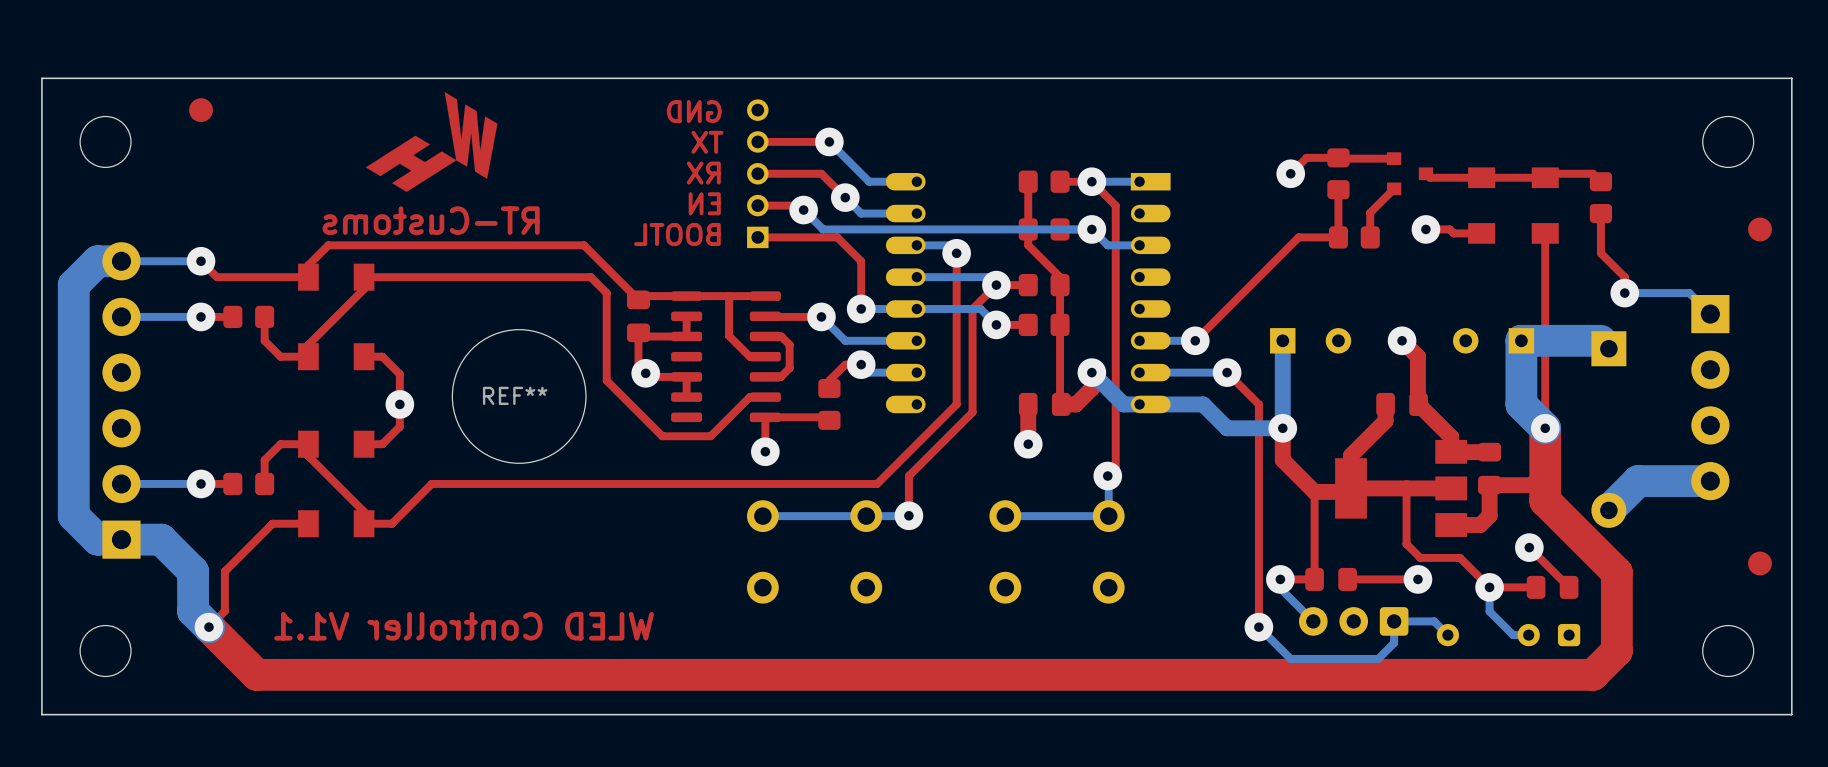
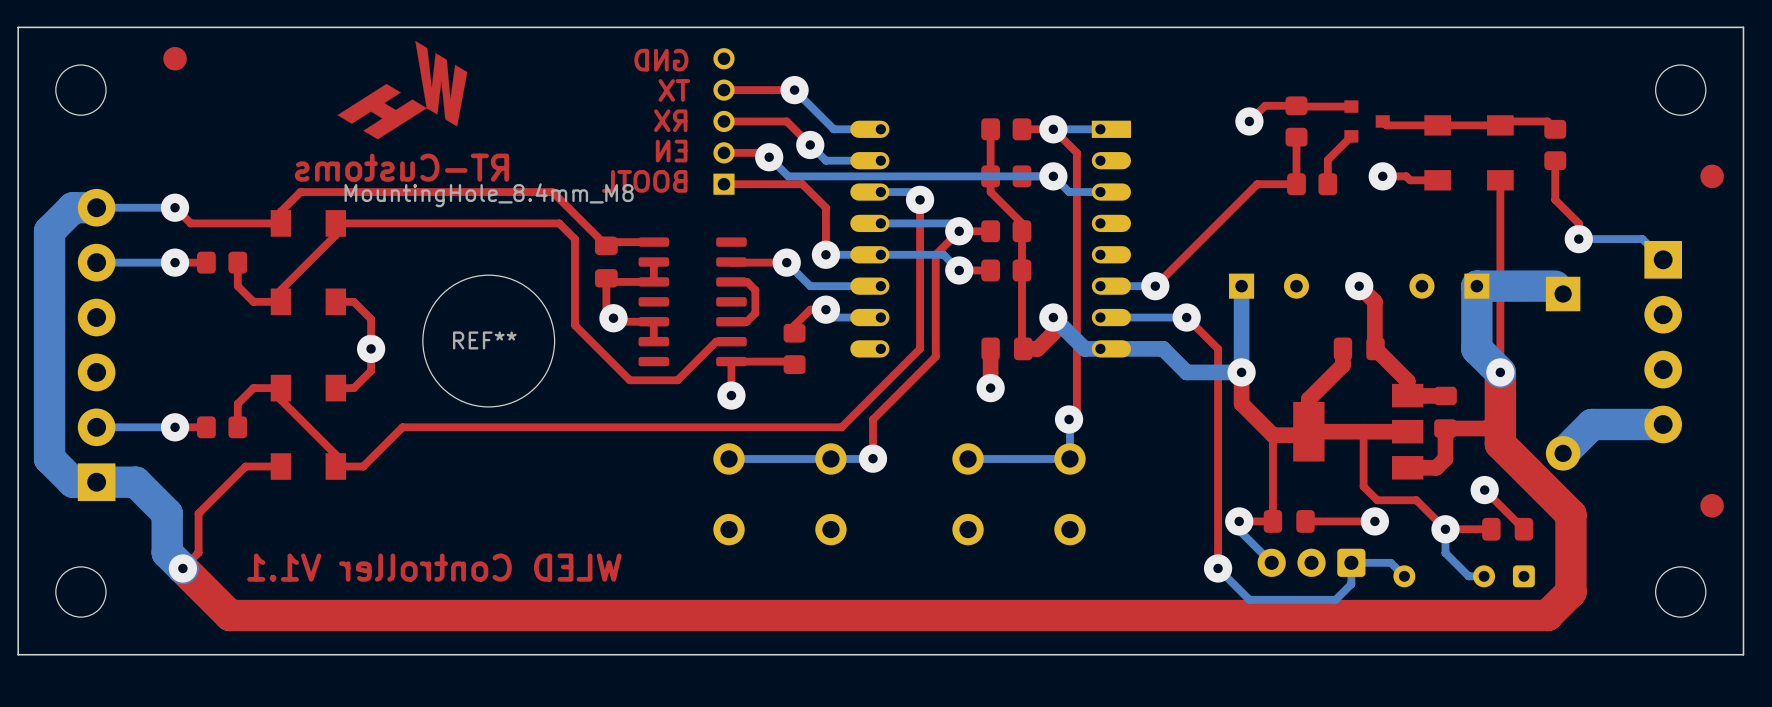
REF** value: none -> MountingHole_8.4mm_M8 (489, 195)
top track: (729, 296) (729, 335) (749, 356) (765, 356) -> none
top track: (765, 296) (686, 296) -> none

